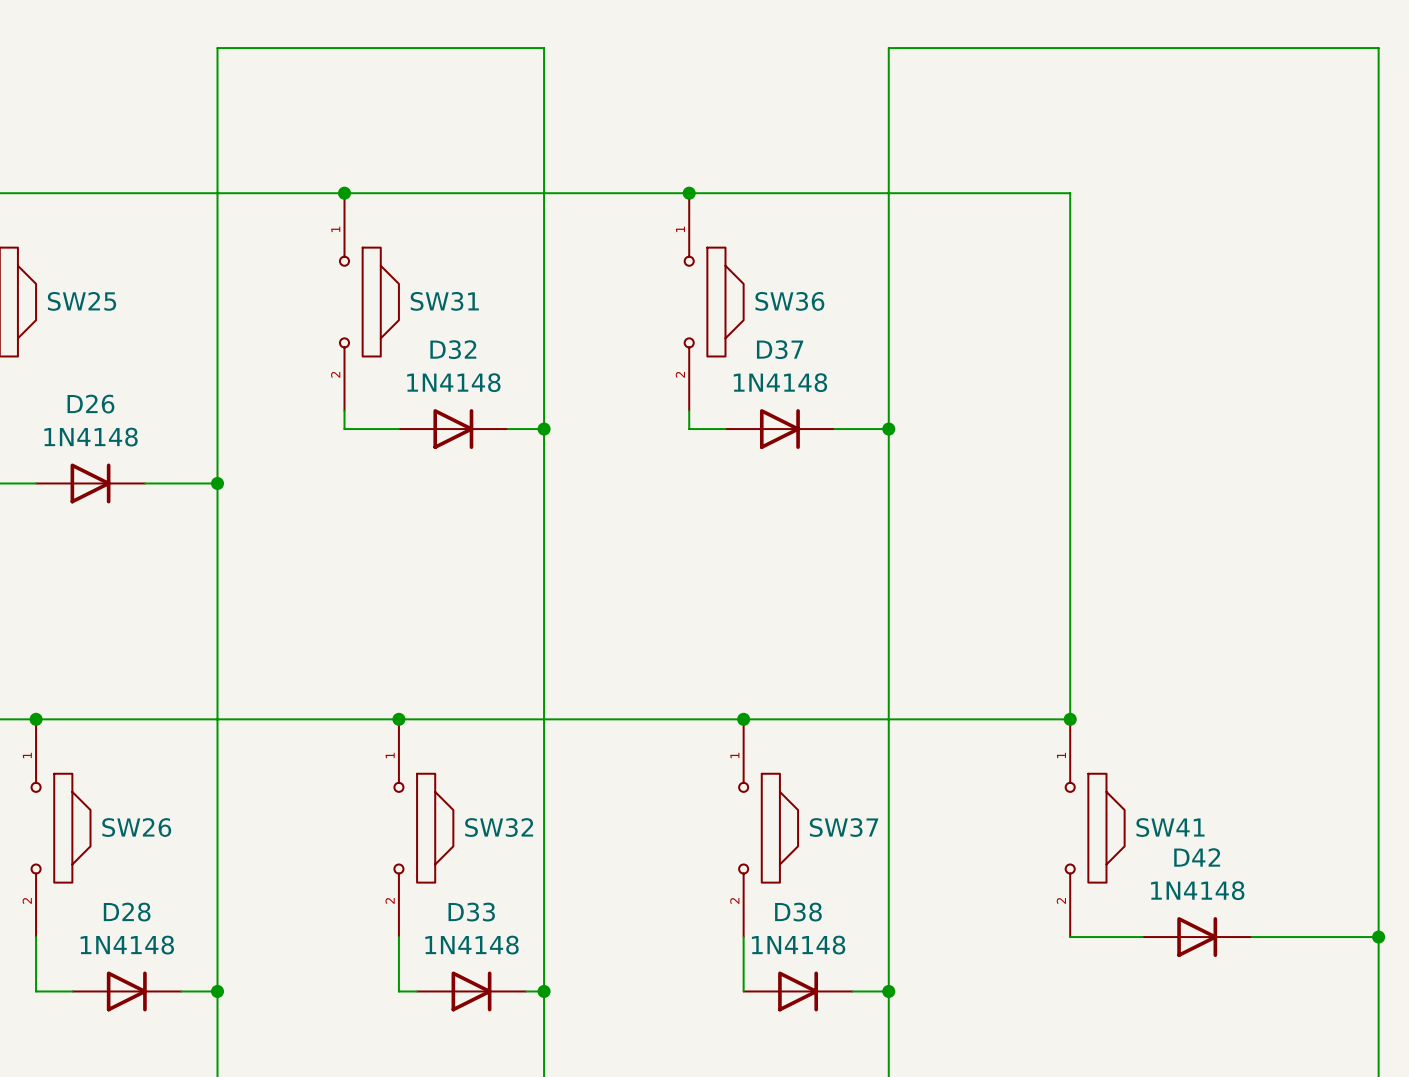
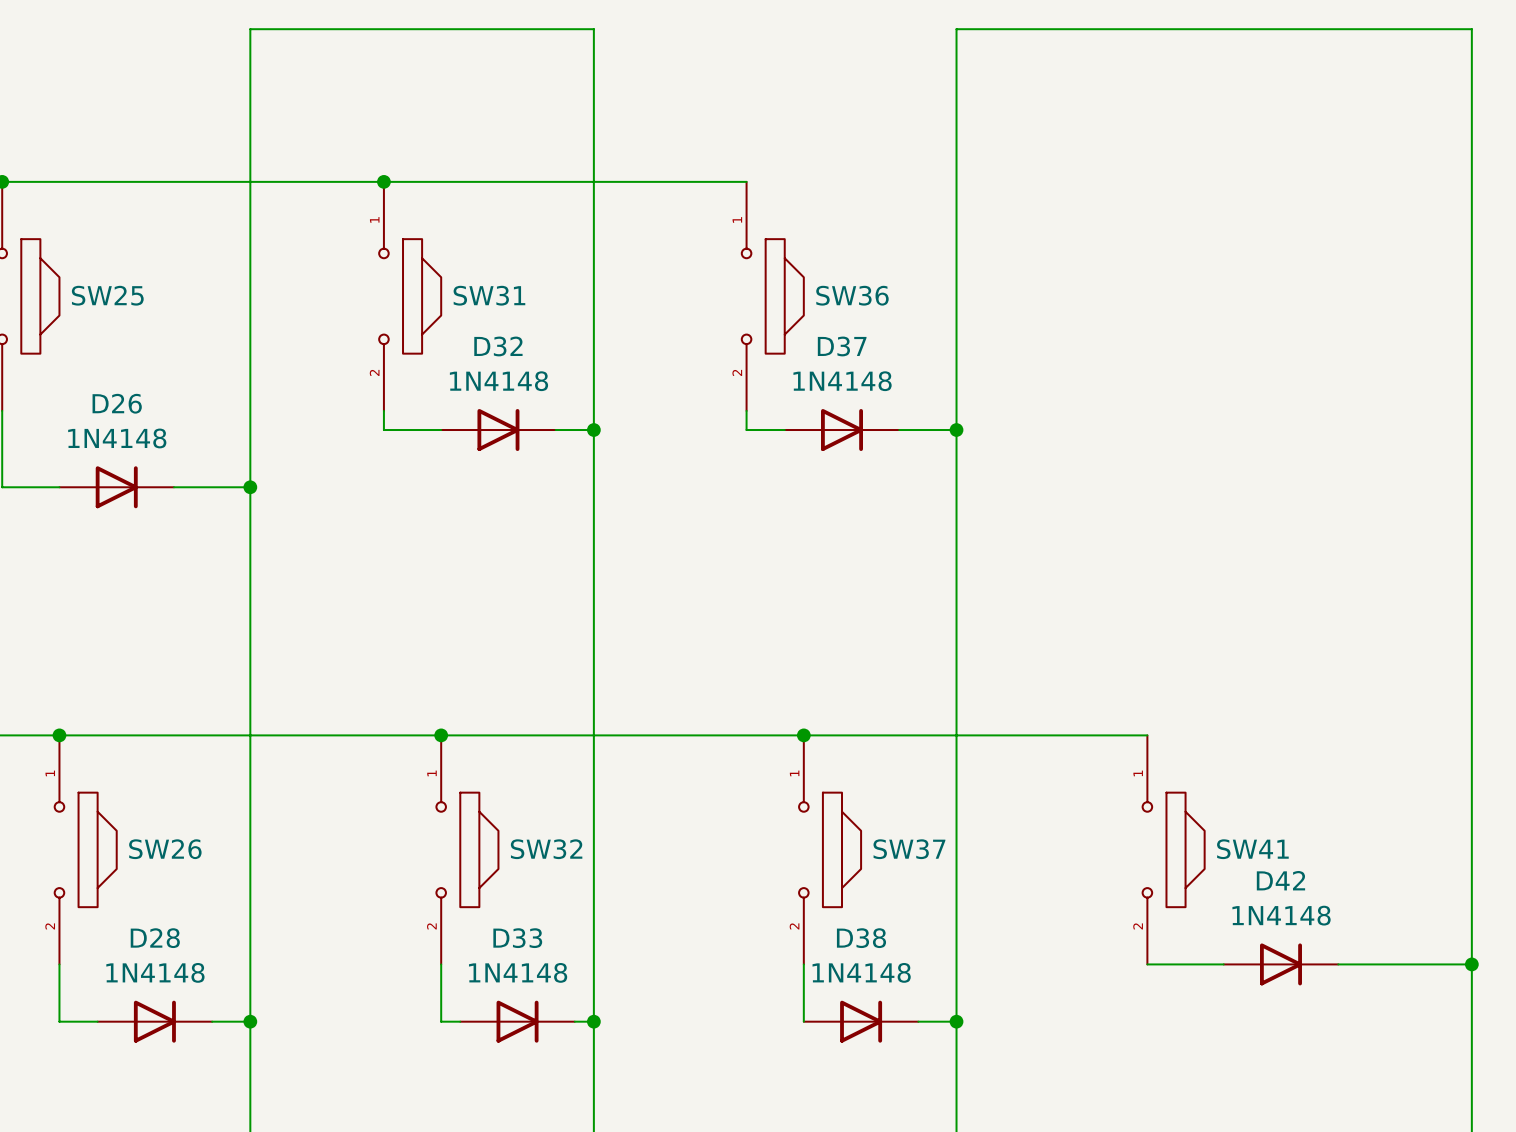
wire: (689, 193) (1070, 193) (1070, 719) -> none
junction: (689, 193) -> none
junction: (1070, 719) -> none

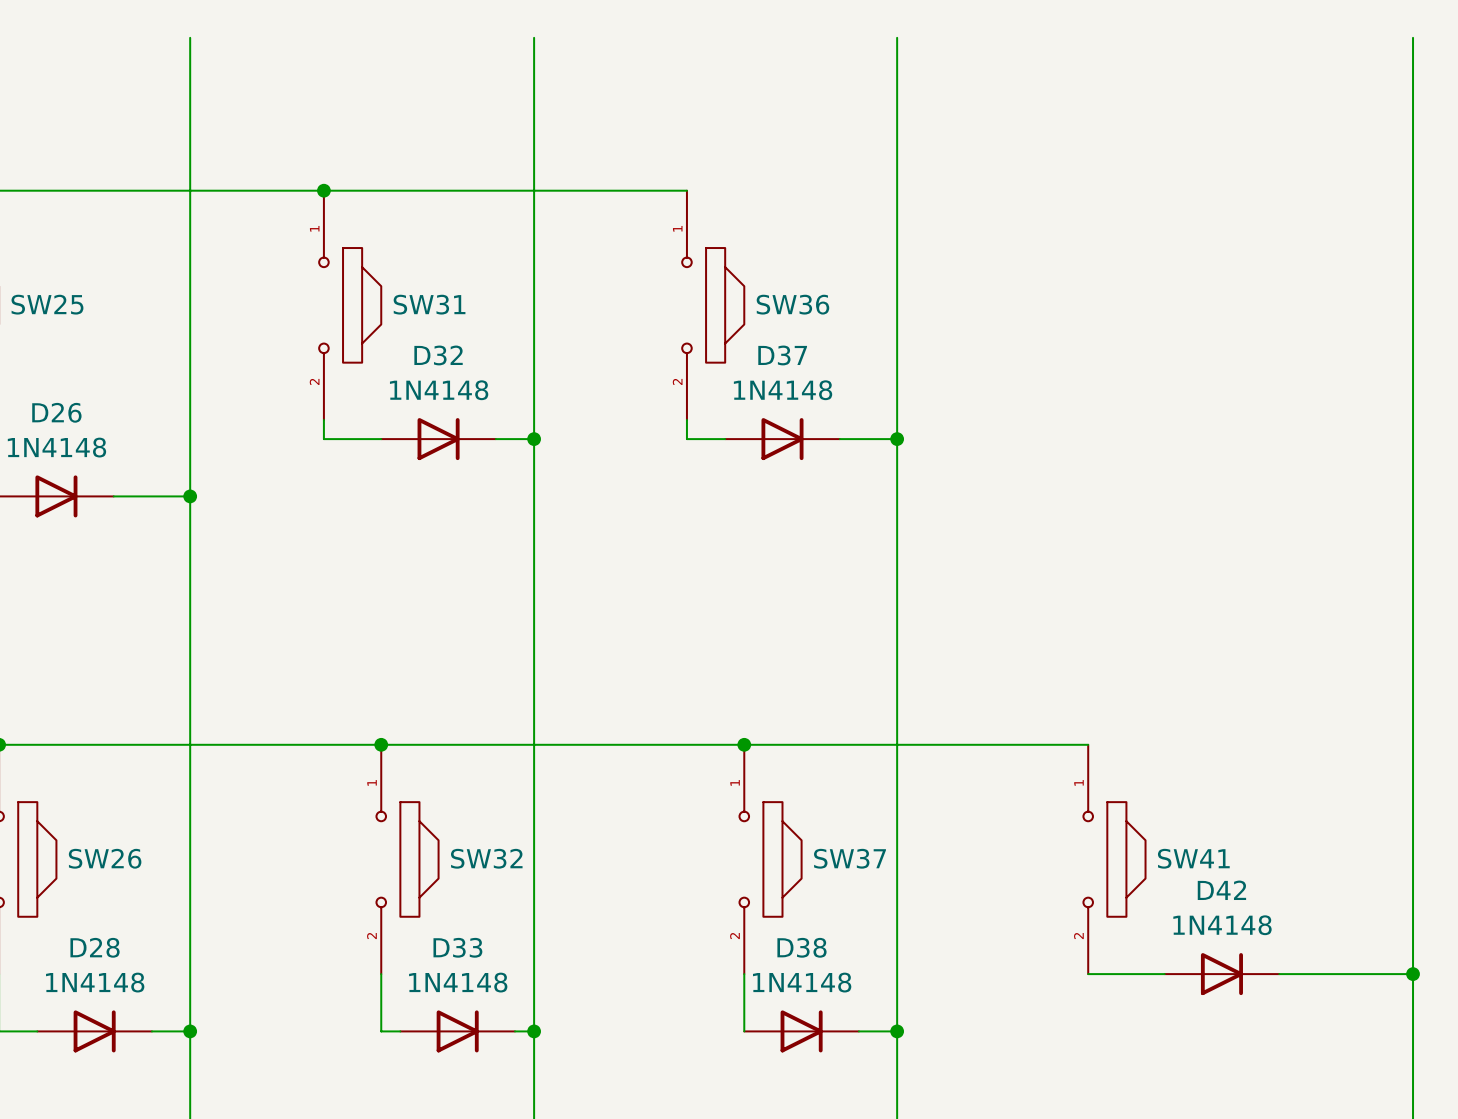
wire: (250, 29) (593, 29) -> none
wire: (956, 29) (1471, 29) -> none

